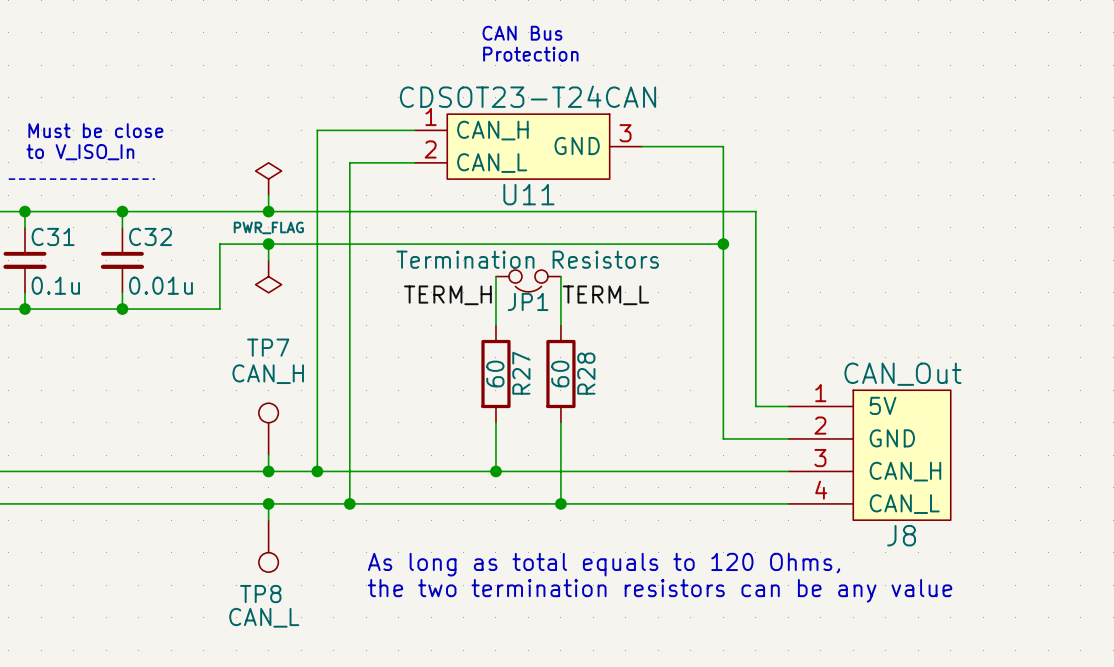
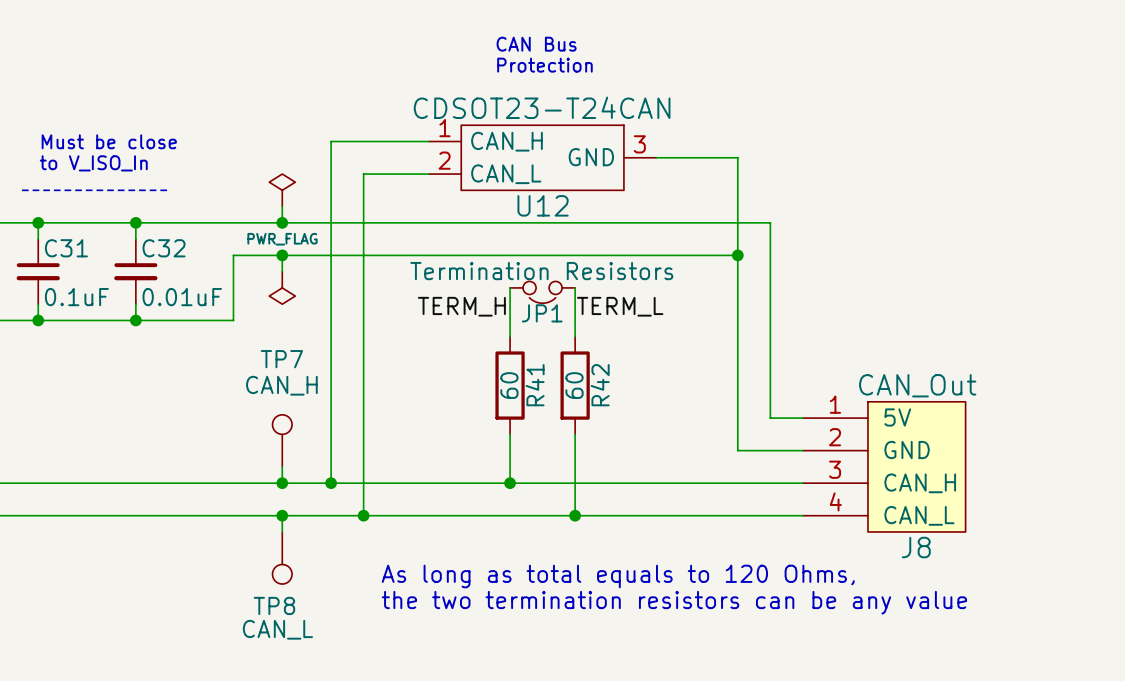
U11: CDSOT23-T24CAN (528, 146) -> none
U12: none -> CDSOT23-T24CAN (542, 157)
C31 value: 0.1u (55, 285) -> 0.1uF (76, 297)
C32 value: 0.01u (161, 285) -> 0.01uF (182, 297)
R27 name: R27 (521, 373) -> R41 (535, 385)
R28 name: R28 (586, 373) -> R42 (600, 385)

